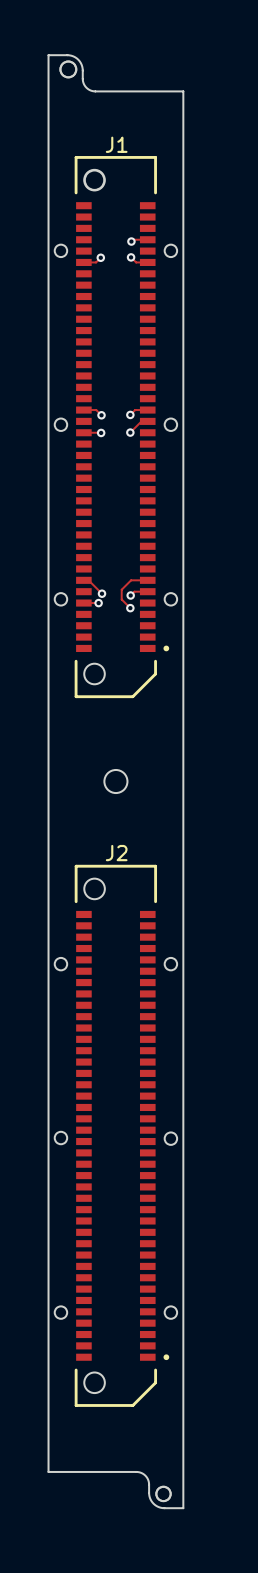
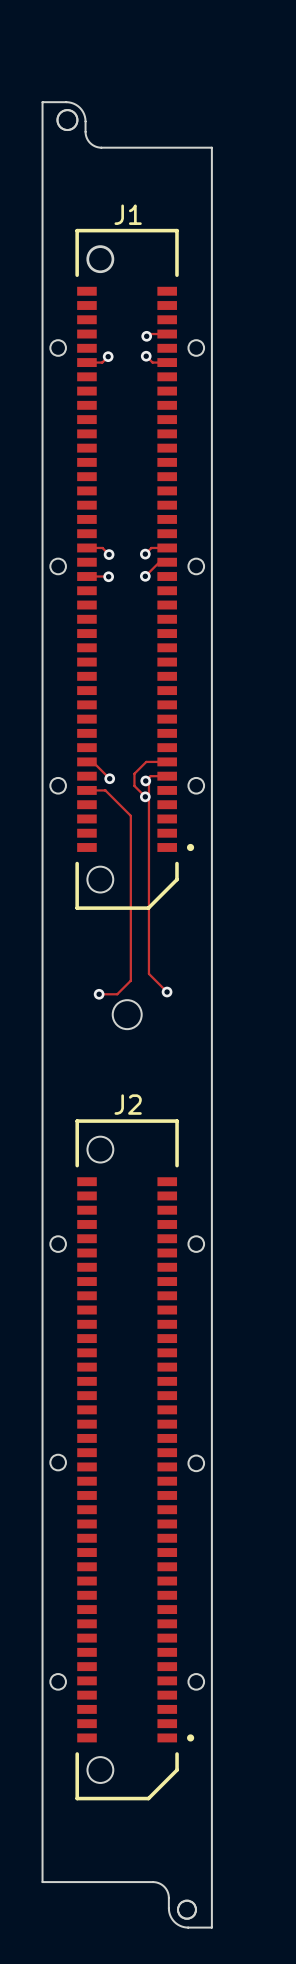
track: none -> (145, 780) (148, 784) (148, 973) (167, 992)
track: none -> (105, 790) (130, 815) (130, 980) (117, 994) (99, 994)
via: (98, 603) -> none
via: none -> (167, 992)
via: none -> (99, 994)

